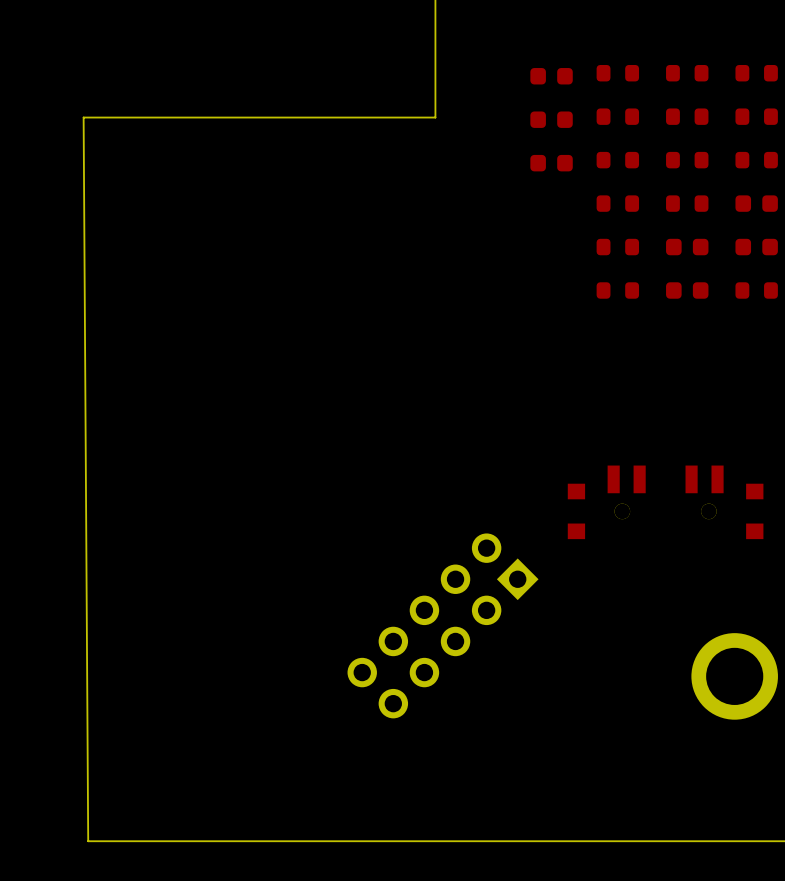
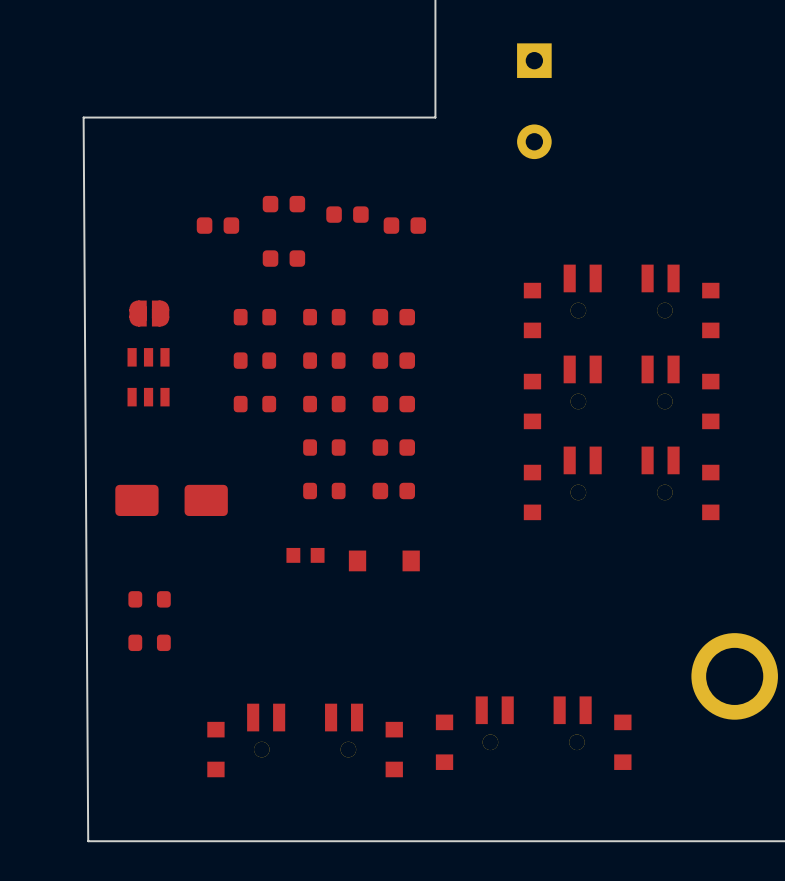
part: none -> (534, 60)
part: (617, 73) -> none
part: (687, 73) -> none
part: (756, 73) -> none
part: (551, 76) -> none
part: (617, 116) -> none
part: (687, 116) -> none
part: (756, 116) -> none
part: (551, 119) -> none
part: none -> (534, 141)
part: (617, 160) -> none
part: (687, 160) -> none
part: (756, 160) -> none
part: (551, 163) -> none
part: (617, 203) -> none
part: (687, 203) -> none
part: (756, 203) -> none
part: none -> (283, 204)
part: none -> (347, 214)
part: none -> (217, 225)
part: none -> (404, 225)
part: (617, 247) -> none
part: (687, 247) -> none
part: (756, 247) -> none
part: none -> (283, 258)
part footprint: [596, 282, 640, 299] -> [523, 264, 720, 339]
part: (687, 290) -> none
part: (756, 290) -> none
part: none -> (149, 313)
part: none -> (254, 317)
part: none -> (324, 317)
part: none -> (393, 317)
part: none -> (254, 360)
part: none -> (324, 360)
part: none -> (393, 360)
part: none -> (148, 377)
part: none -> (621, 392)
part: none -> (254, 404)
part: none -> (324, 404)
part: none -> (393, 404)
part: none -> (324, 447)
part: none -> (393, 447)
part: none -> (324, 490)
part: none -> (393, 490)
part: none -> (171, 500)
part position: (665, 502) -> (621, 483)
part: none -> (305, 555)
part: none -> (384, 560)
part: none -> (149, 599)
part: (443, 625) -> none
part: none -> (149, 642)
part: none -> (533, 733)
part: none -> (305, 740)

